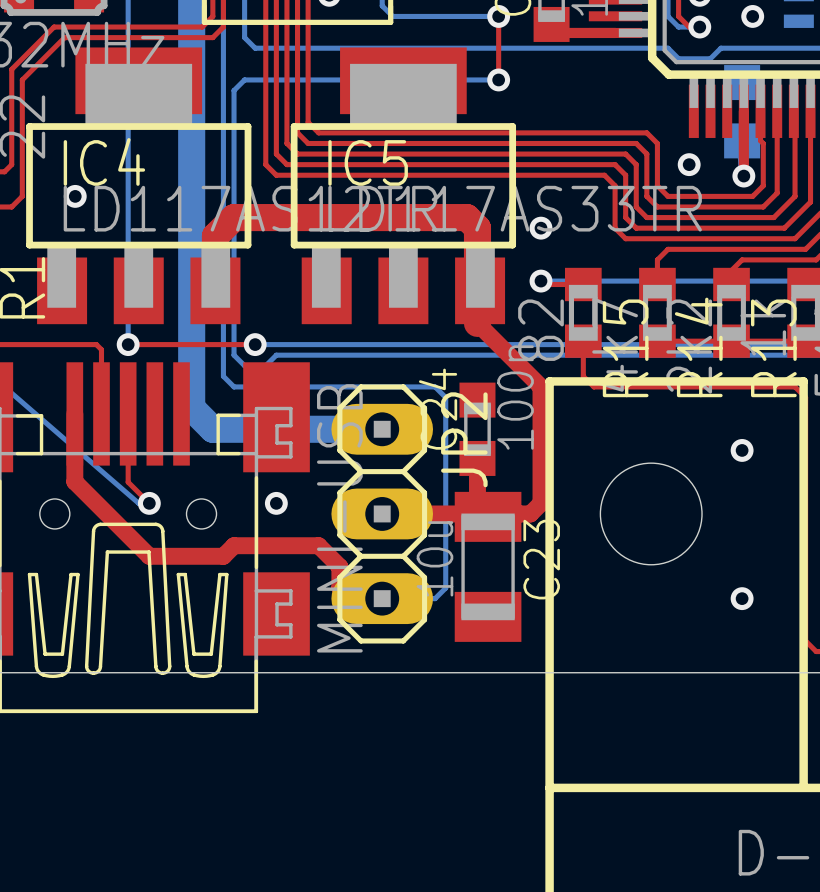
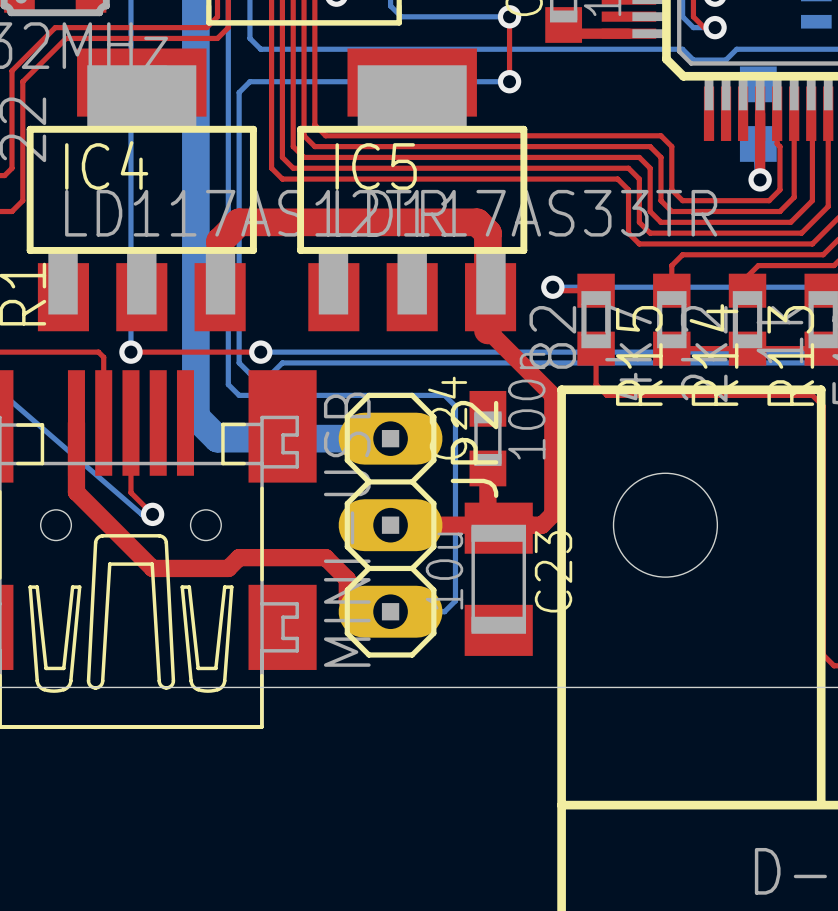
via: (752, 16) -> none
via: (689, 164) -> none
via: (75, 196) -> none
via: (540, 228) -> none
via: (742, 450) -> none
via: (276, 503) -> none
via: (742, 598) -> none

